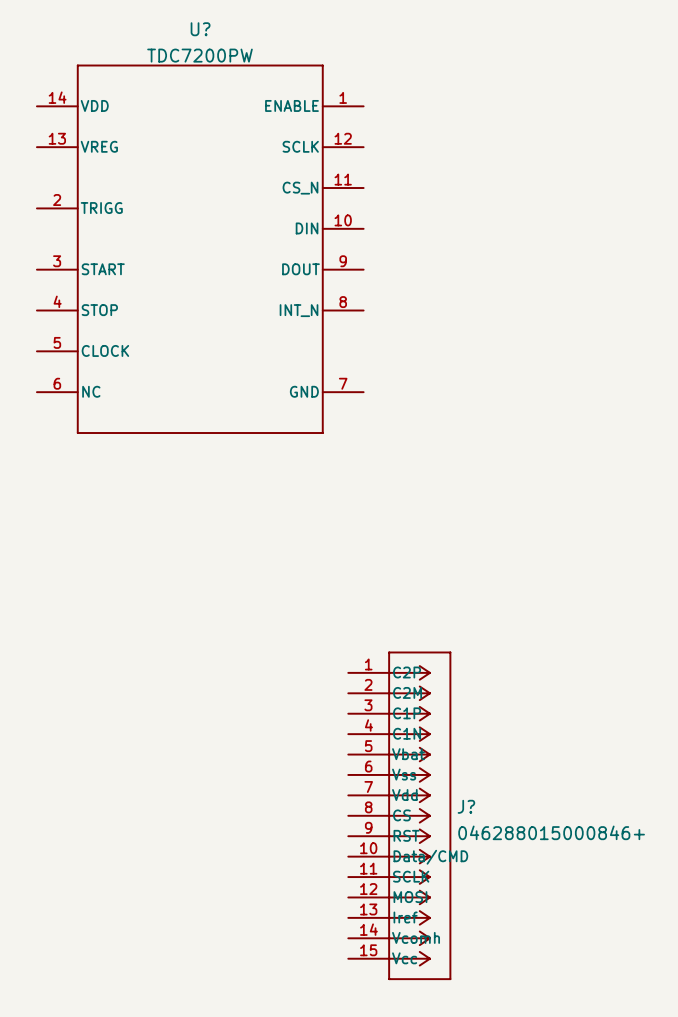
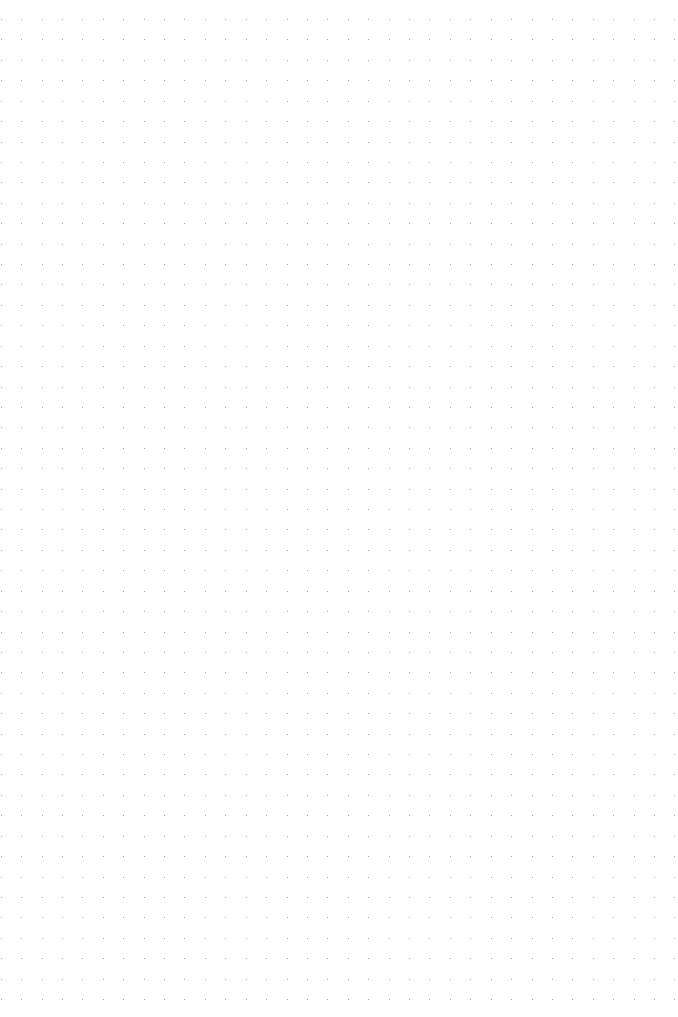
U?: TDC7200PW (200, 249) -> none
J?: 046288015000846+ (399, 815) -> none

